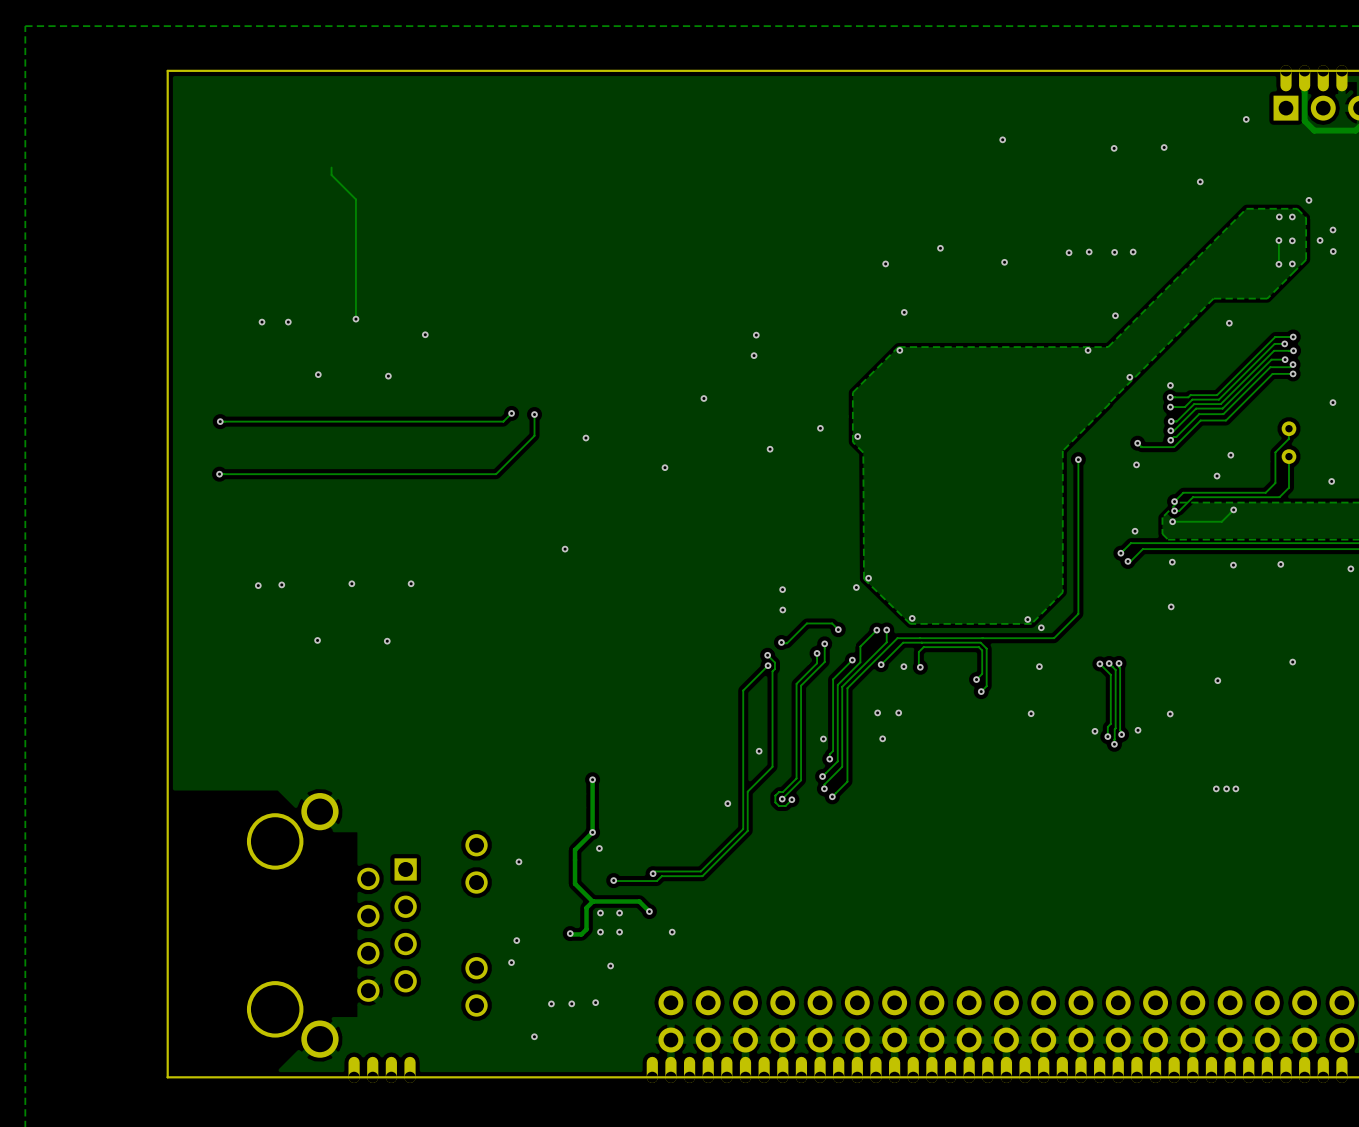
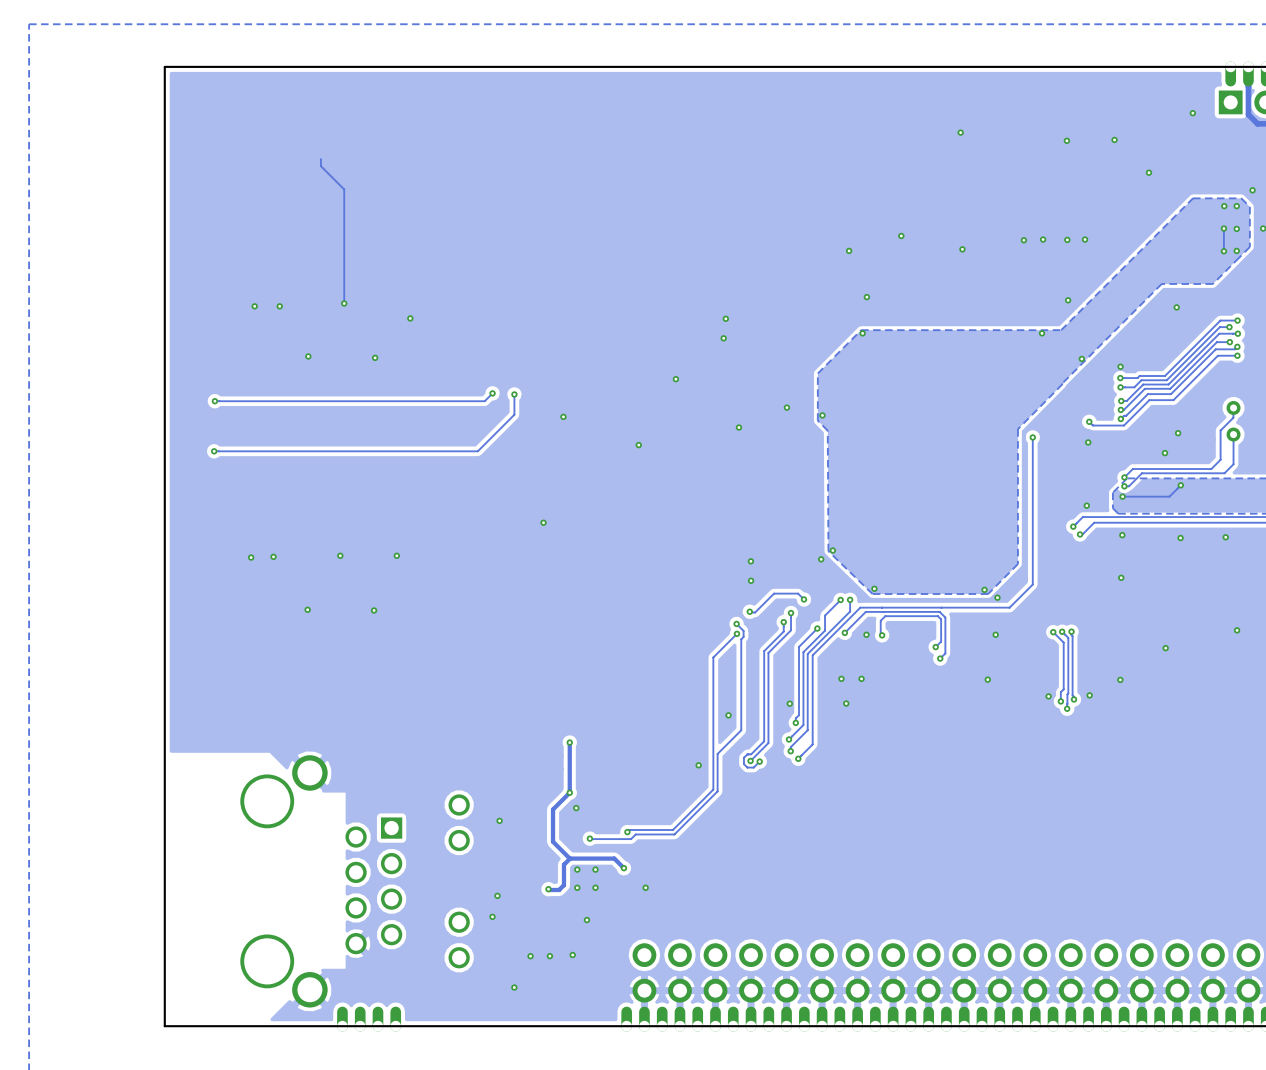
via: (1216, 788) -> none
via: (1226, 788) -> none
via: (1235, 788) -> none

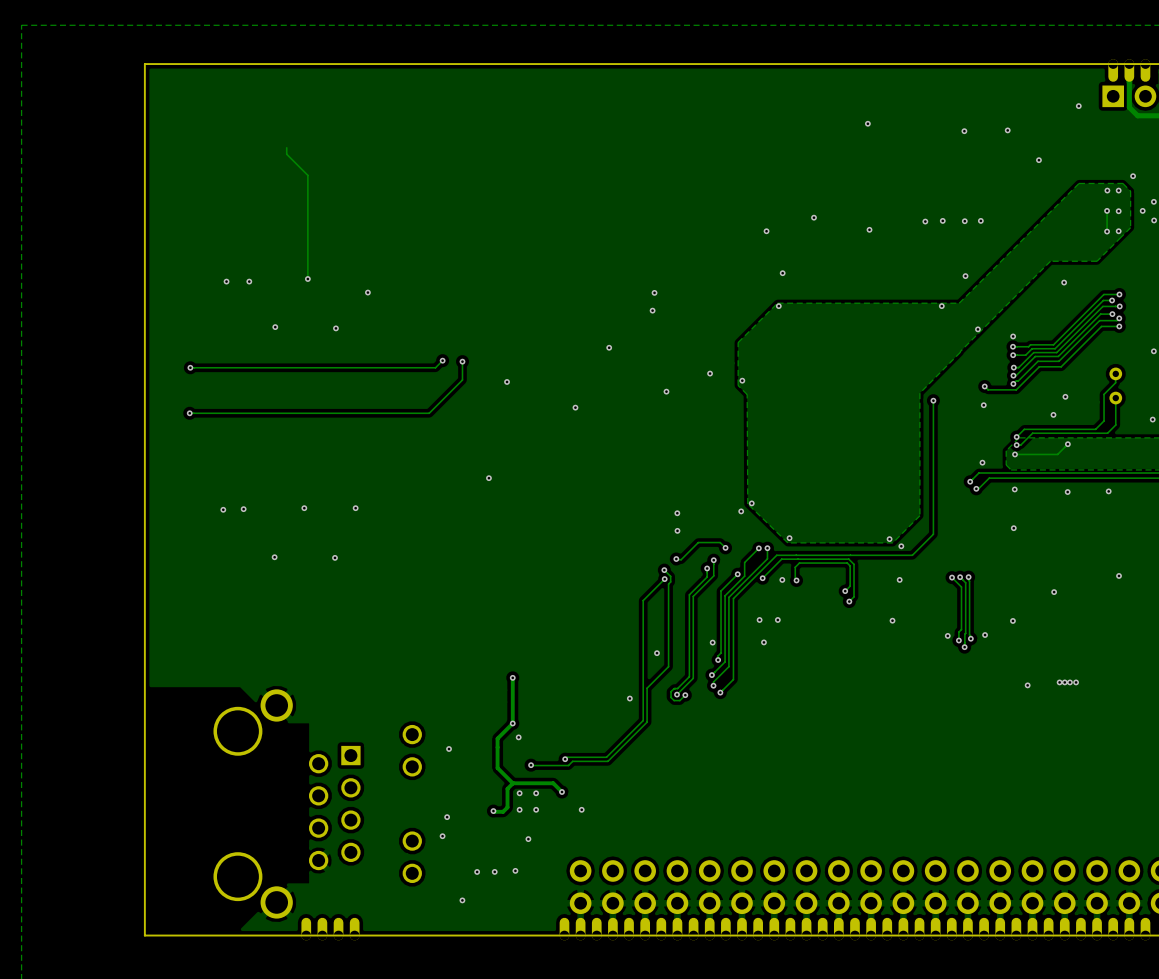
via: none -> (1059, 682)
via: none -> (1064, 682)
via: none -> (1069, 682)
via: none -> (1076, 682)
via: none -> (1027, 685)

